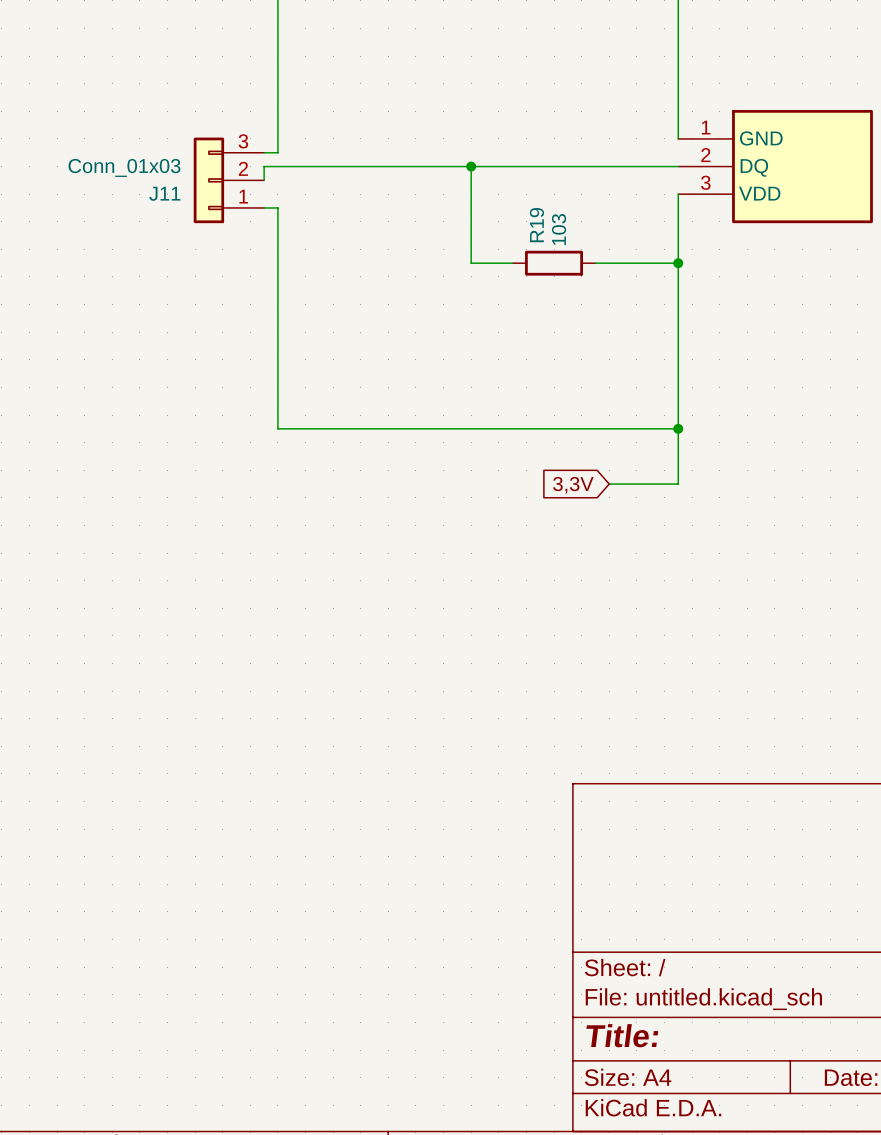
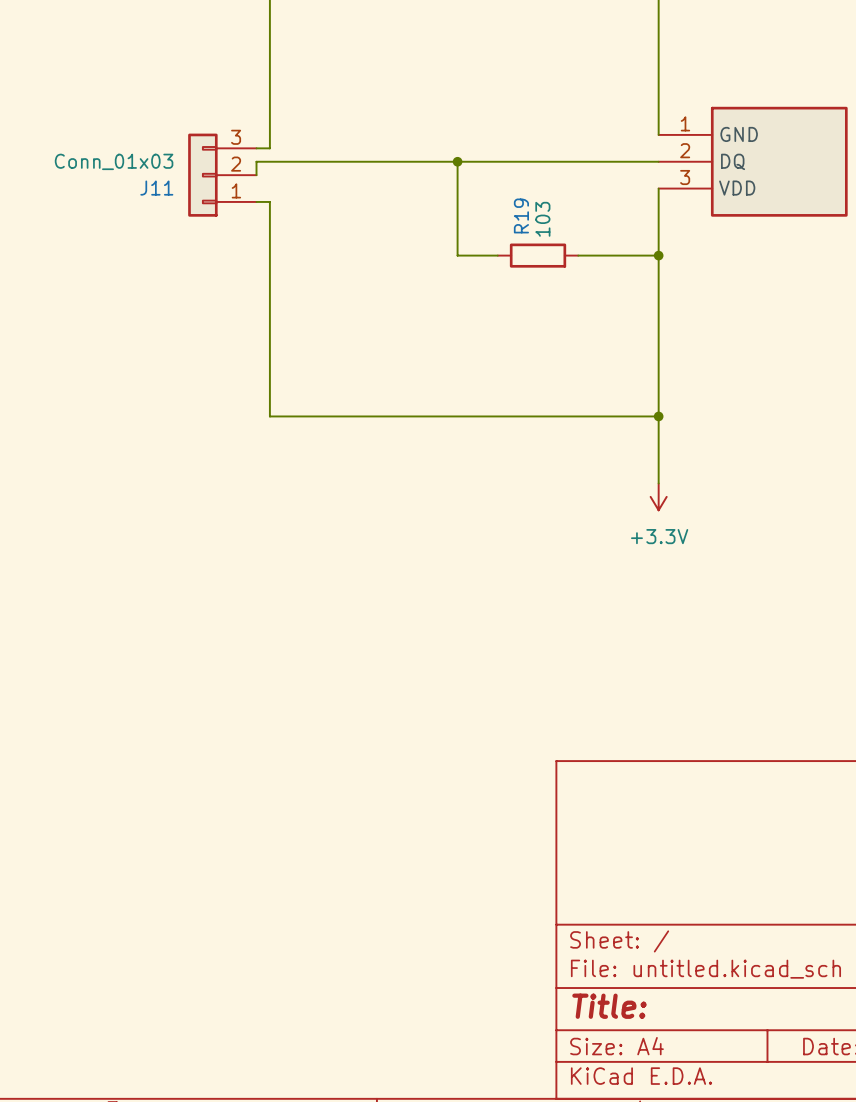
wire: (609, 484) (678, 484) -> (658, 483) (658, 470)
global label: 3,3V (573, 485) -> none
power symbol: none -> +3.3V (658, 496)

